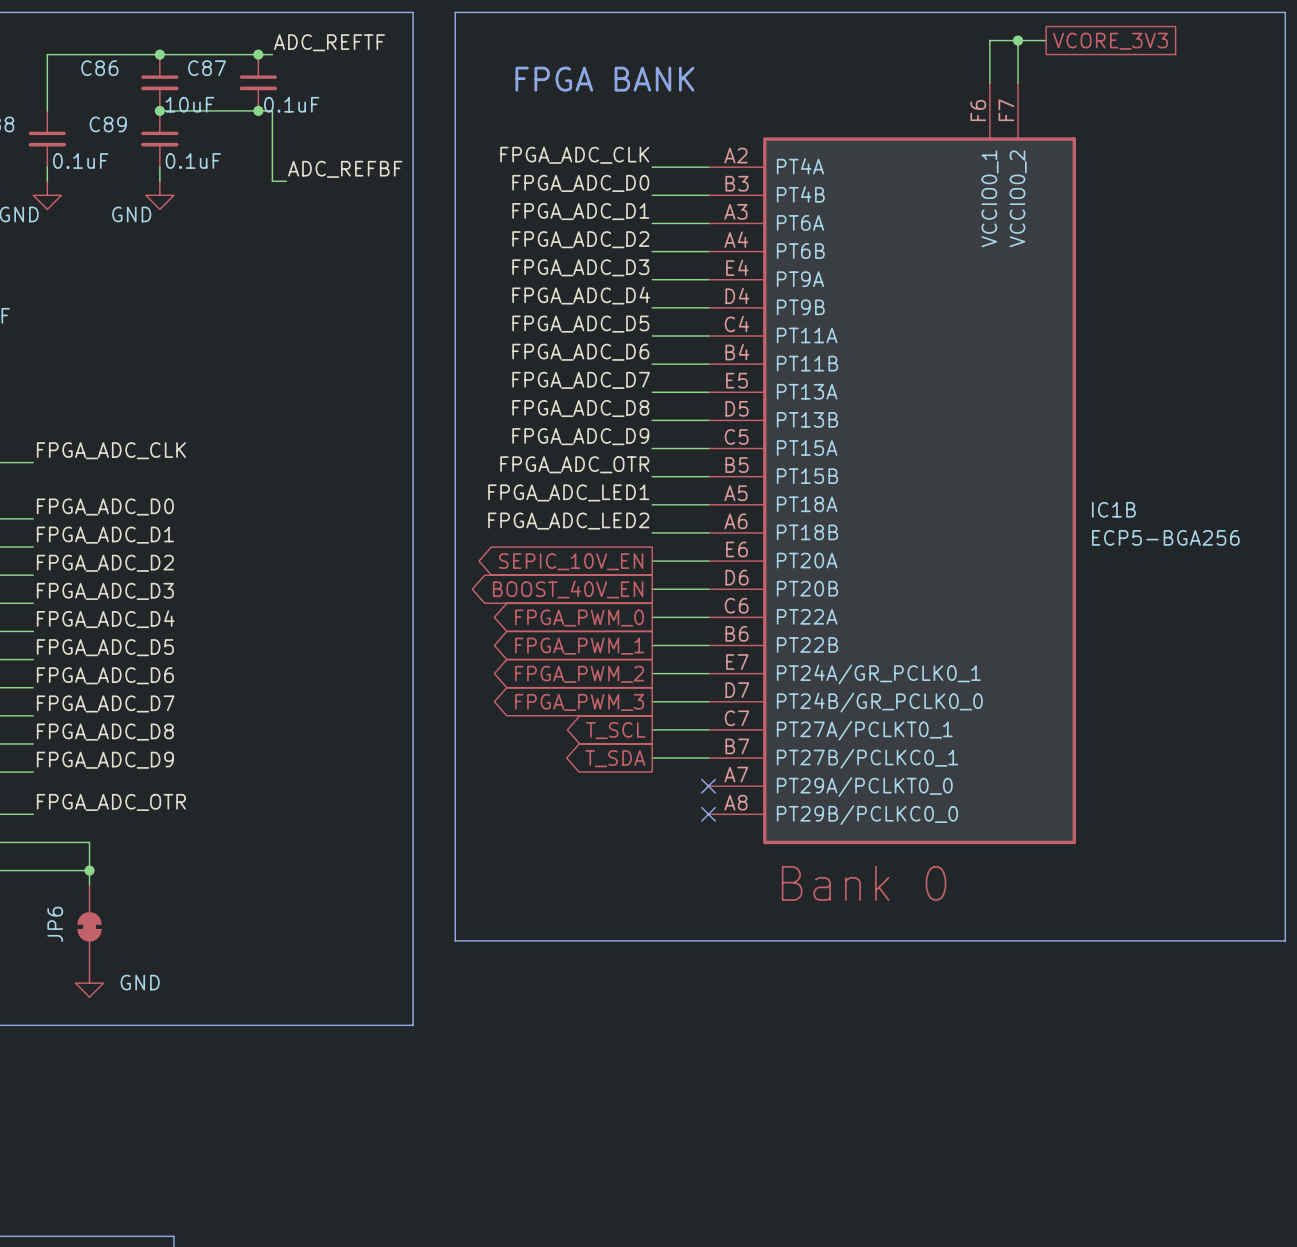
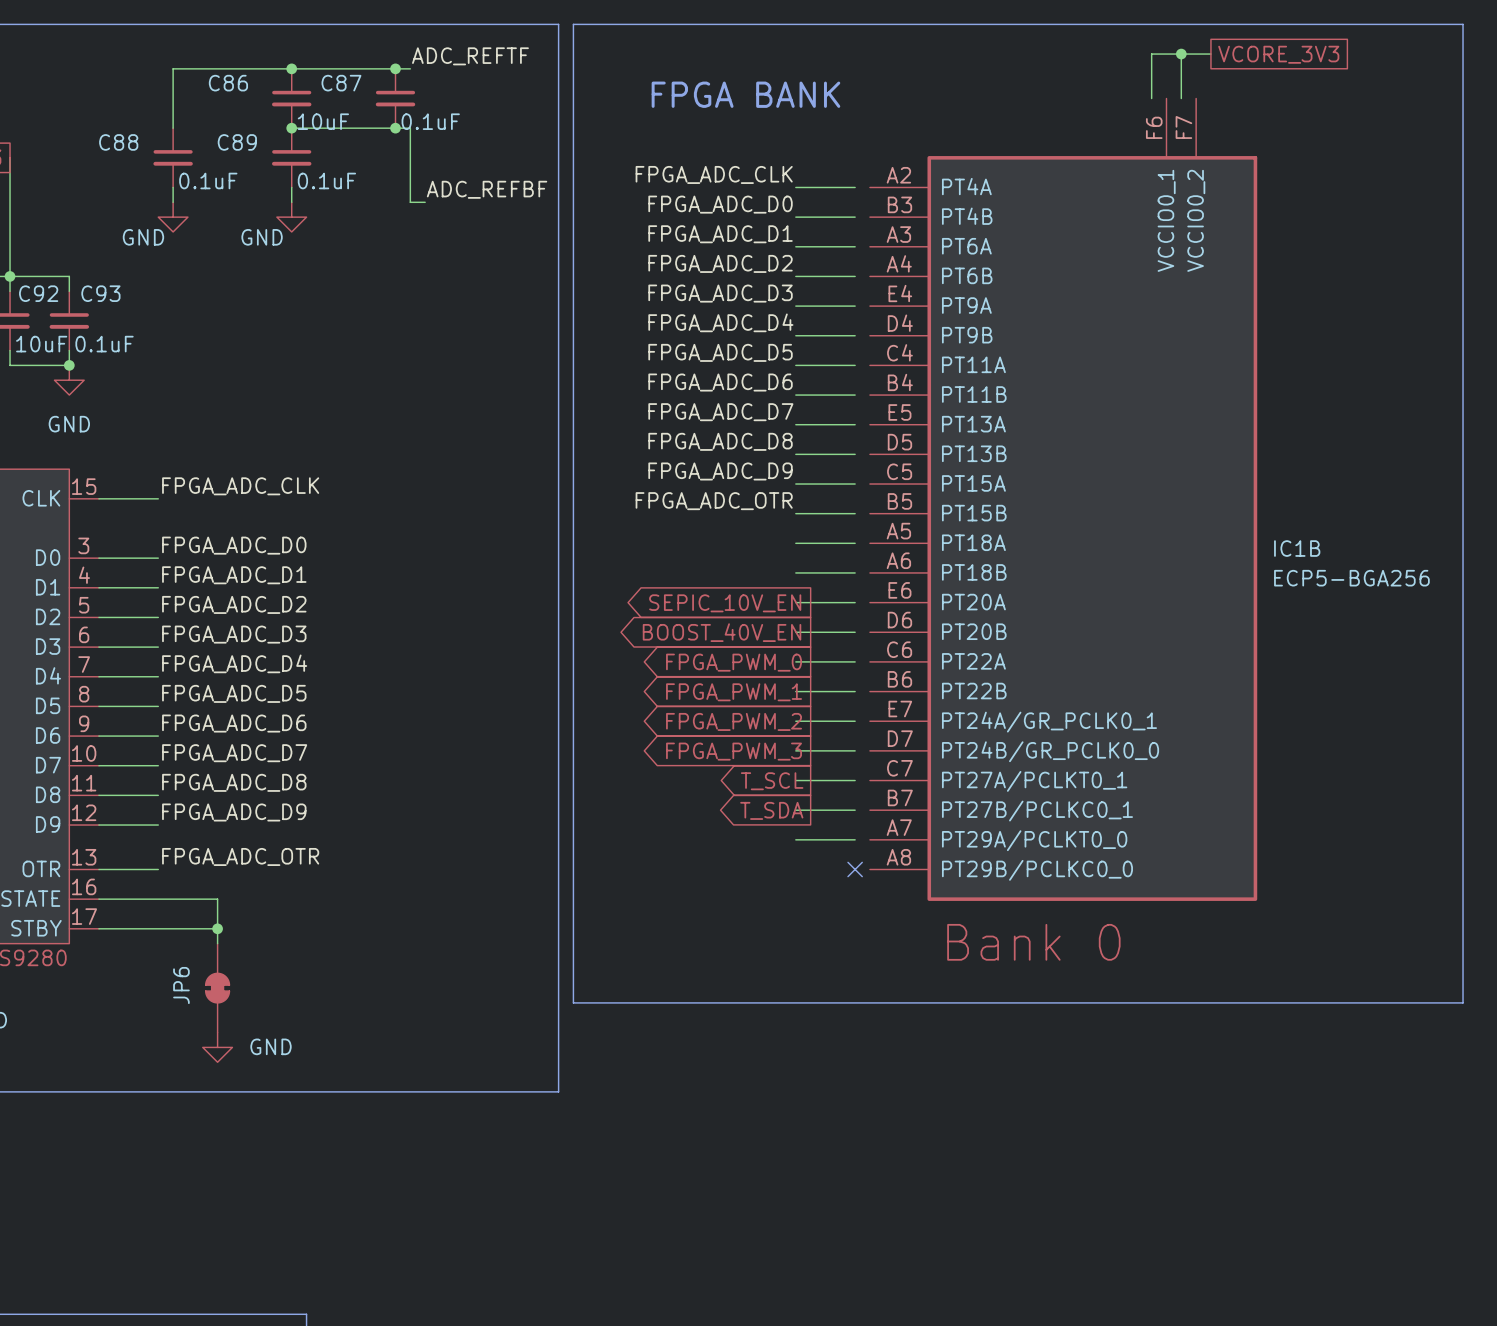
line: (455, 12) (455, 940) -> (603, 24) (573, 24) (573, 1002) (603, 1002)
line: (1271, 12) (1285, 12) (1285, 940) (1271, 940) -> (1463, 24) (1463, 1002)
wire: (989, 40) (989, 82) -> (1166, 54) (1151, 54) (1151, 98)
wire: (1018, 40) (1018, 82) -> (1181, 54) (1181, 98)
junction position: (1018, 40) -> (1181, 54)
wire: (1032, 40) (1046, 40) -> none
global label position: VCORE_3V3 (1110, 41) -> VCORE_3V3 (1278, 54)
text position: FPGA BANK (604, 79) -> FPGA BANK (745, 94)
label position: FPGA_ADC_CLK (574, 155) -> FPGA_ADC_CLK (714, 174)
wire: (694, 167) (708, 167) -> (795, 187) (810, 187)
label position: FPGA_ADC_D0 (580, 183) -> FPGA_ADC_D0 (720, 204)
wire: (694, 195) (708, 195) -> (795, 217) (810, 217)
label position: FPGA_ADC_D1 (580, 211) -> FPGA_ADC_D1 (720, 234)
wire: (694, 223) (708, 223) -> (795, 246) (810, 246)
label position: FPGA_ADC_D2 (580, 239) -> FPGA_ADC_D2 (720, 263)
wire: (694, 251) (708, 251) -> (795, 276) (810, 276)
label position: FPGA_ADC_D3 (580, 267) -> FPGA_ADC_D3 (720, 293)
wire: (694, 279) (708, 279) -> (795, 306) (810, 306)
label position: FPGA_ADC_D4 (581, 295) -> FPGA_ADC_D4 (720, 322)
wire: (694, 307) (708, 307) -> (795, 335) (810, 335)
label position: FPGA_ADC_D5 (580, 324) -> FPGA_ADC_D5 (720, 352)
wire: (694, 335) (708, 335) -> (795, 365) (810, 365)
label position: FPGA_ADC_D6 (580, 352) -> FPGA_ADC_D6 (720, 382)
wire: (694, 364) (708, 364) -> (795, 395) (810, 395)
label position: FPGA_ADC_D7 (581, 380) -> FPGA_ADC_D7 (720, 412)
wire: (694, 392) (708, 392) -> (795, 424) (810, 424)
label position: FPGA_ADC_D8 (580, 408) -> FPGA_ADC_D8 (720, 441)
wire: (694, 420) (708, 420) -> (795, 454) (810, 454)
label position: FPGA_ADC_D9 (580, 436) -> FPGA_ADC_D9 (720, 471)
wire: (694, 448) (708, 448) -> (795, 484) (810, 484)
label position: FPGA_ADC_OTR (574, 464) -> FPGA_ADC_OTR (714, 501)
wire: (694, 476) (708, 476) -> (795, 513) (810, 513)
label: FPGA_ADC_LED1 (568, 492) -> none
wire: (694, 504) (708, 504) -> (795, 543) (810, 543)
label: FPGA_ADC_LED2 (568, 521) -> none
wire: (694, 532) (708, 532) -> (795, 572) (810, 572)
wire: (694, 561) (708, 561) -> (795, 602) (810, 602)
wire: (694, 589) (708, 589) -> (795, 632) (810, 632)
wire: (694, 617) (708, 617) -> (795, 661) (810, 661)
wire: (694, 645) (708, 645) -> (795, 691) (810, 691)
wire: (694, 673) (708, 673) -> (795, 721) (810, 721)
wire: (694, 701) (708, 701) -> (795, 750) (810, 750)
wire: (694, 729) (708, 729) -> (795, 780) (810, 780)
wire: (694, 758) (708, 758) -> (795, 810) (810, 810)
wire: none -> (795, 839) (855, 839)
no-connect mark: (708, 786) -> none
no-connect mark position: (708, 814) -> (855, 869)

